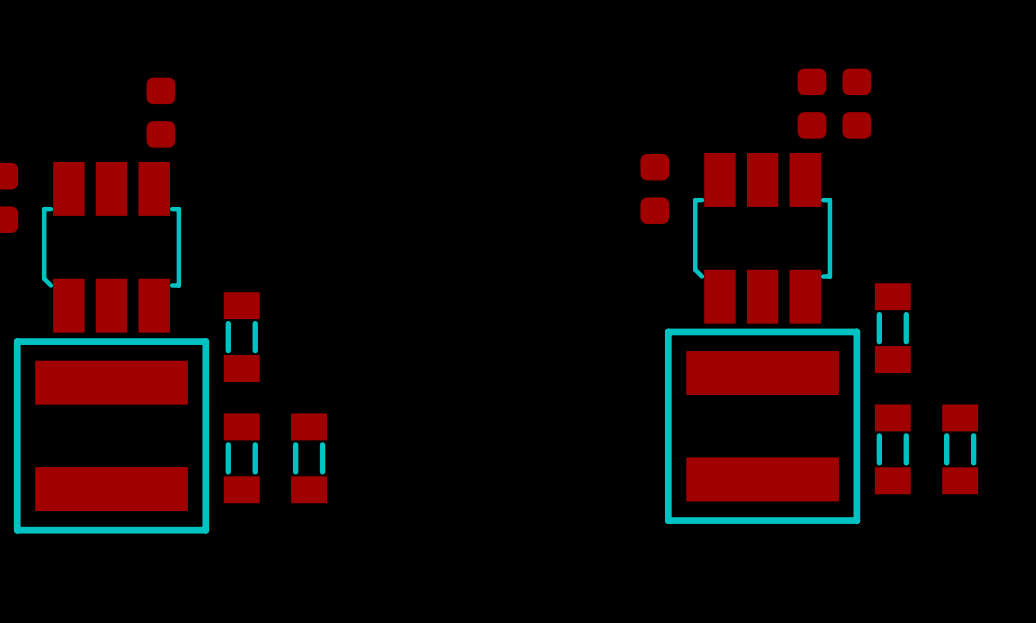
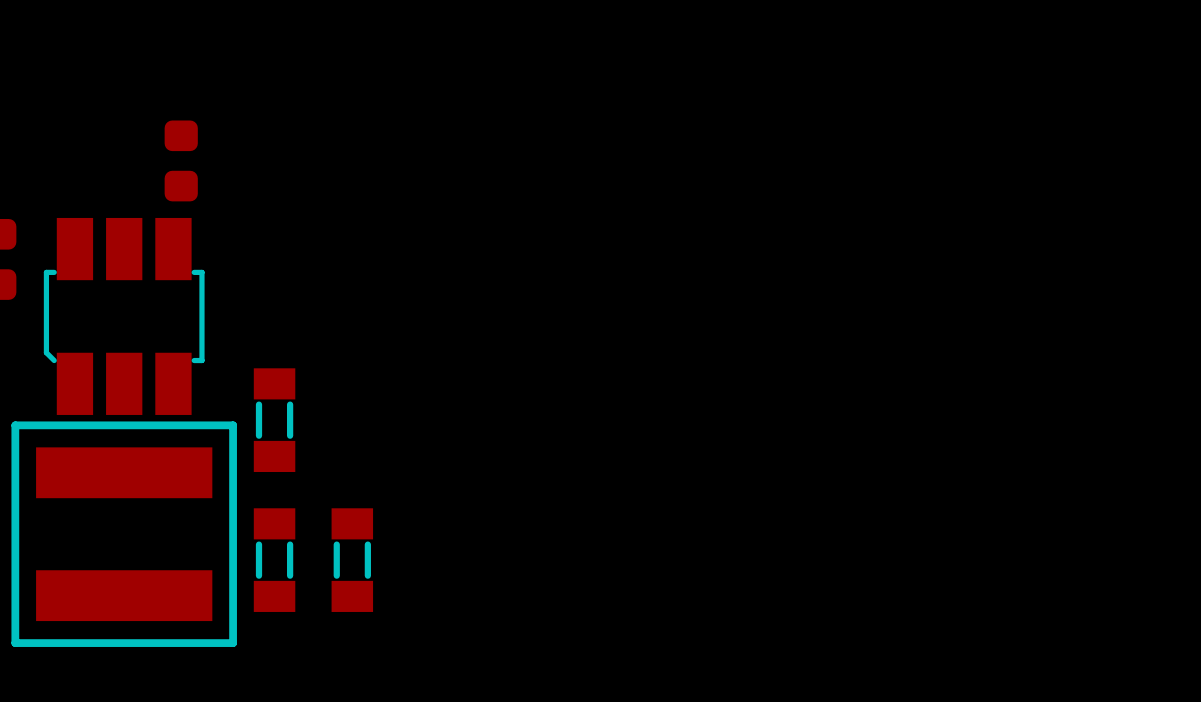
part: (811, 103) -> none
part: (856, 103) -> none
part: (654, 188) -> none
part: (762, 238) -> none
part: (892, 328) -> none
part: (762, 426) -> none
part: (892, 449) -> none
part: (960, 449) -> none

